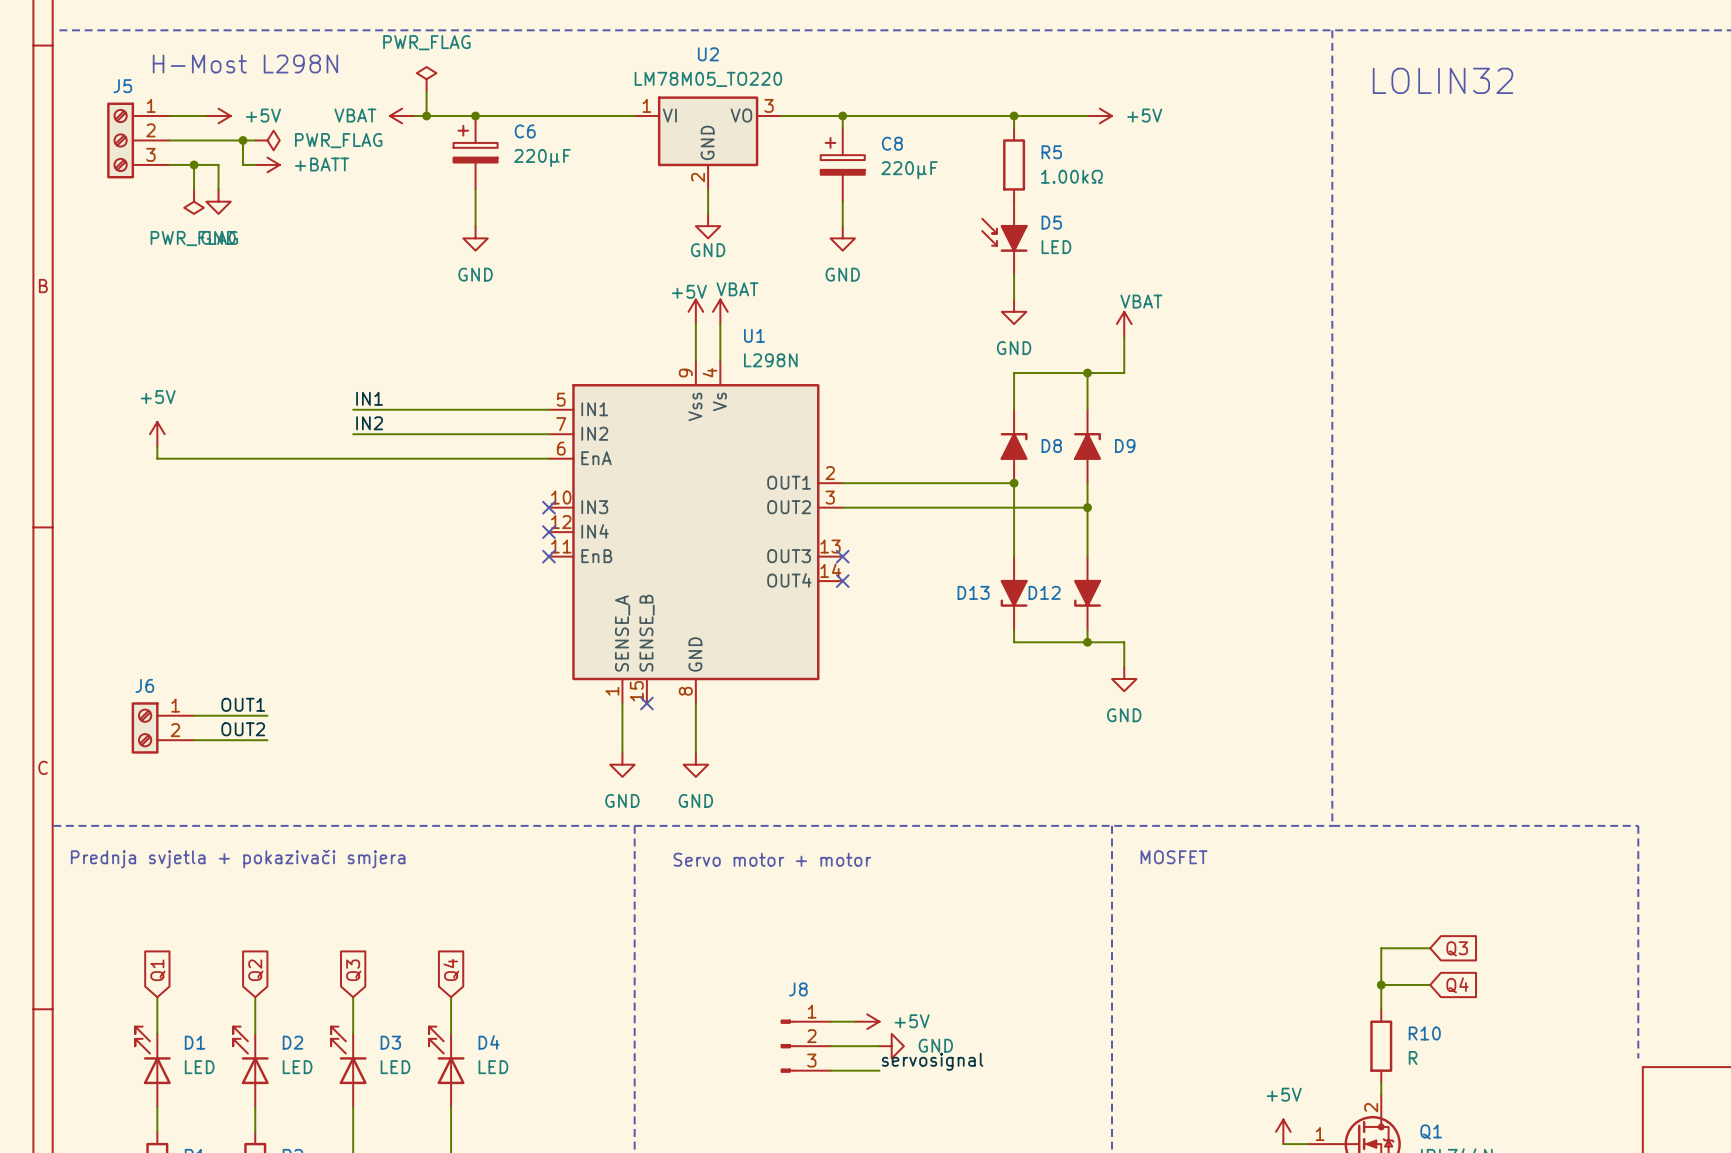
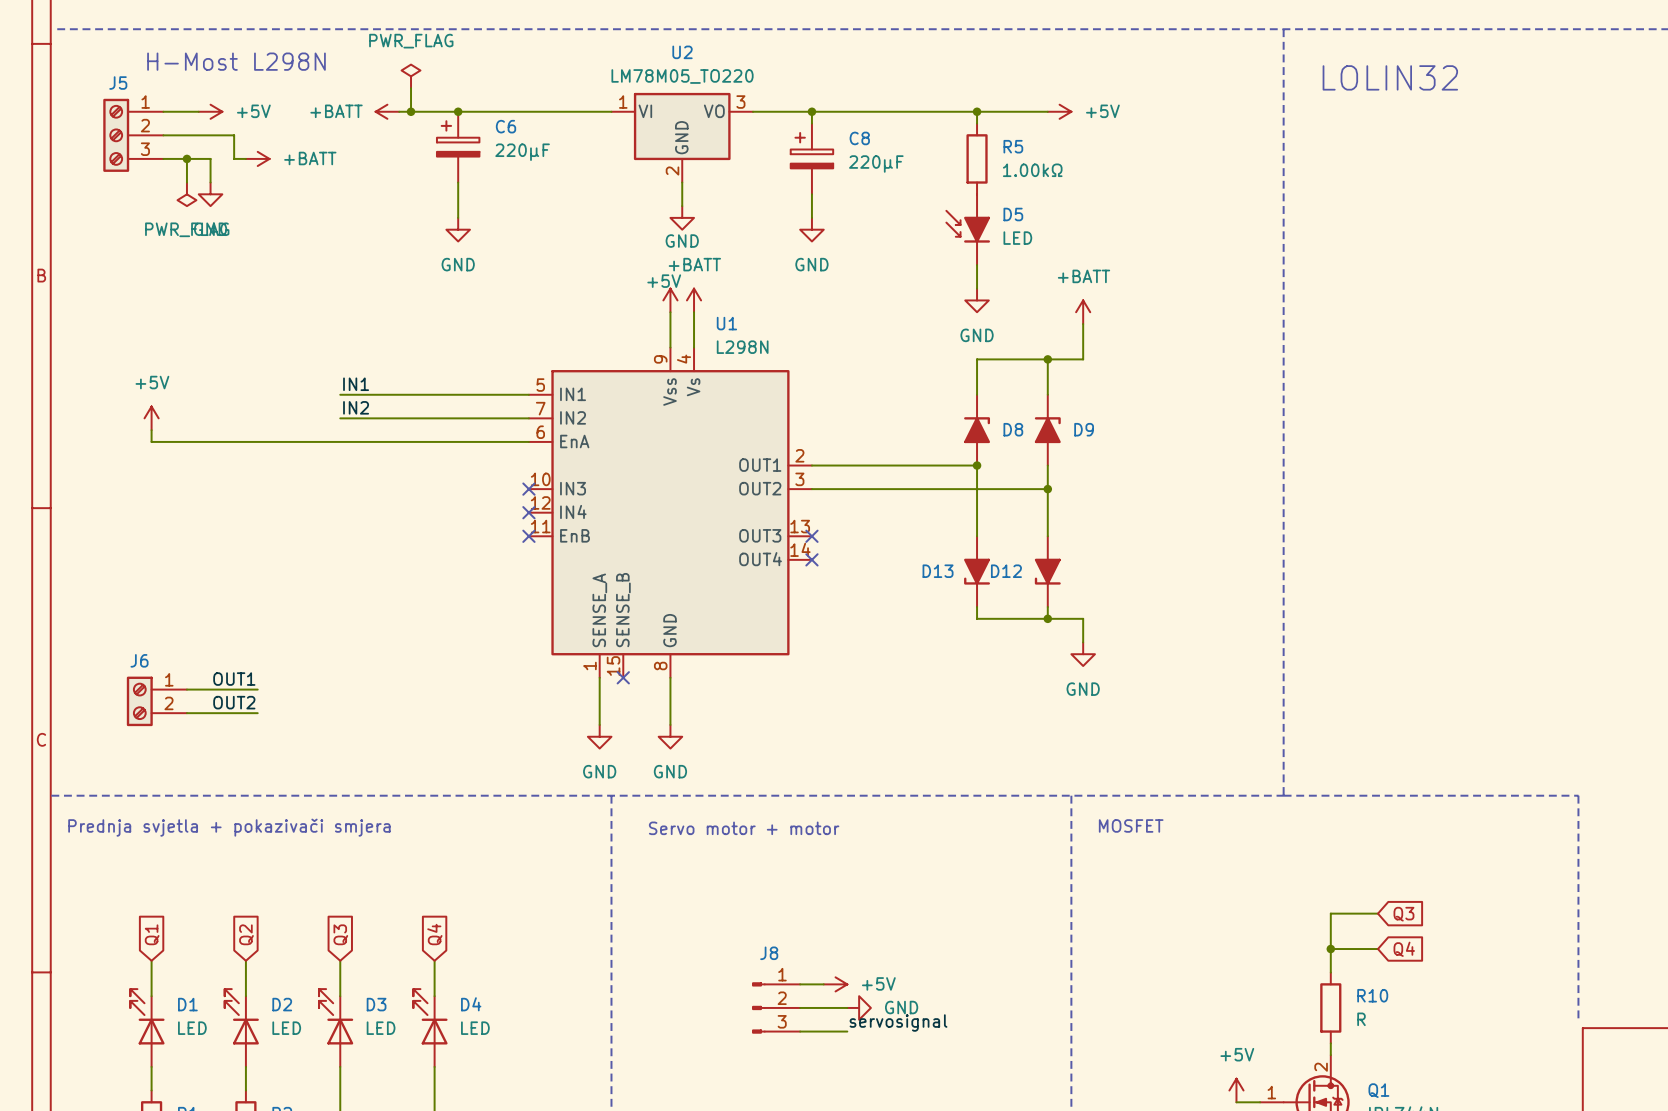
power symbol: VBAT (402, 116) -> +BATT (387, 111)
wire: (243, 140) (255, 140) -> none
junction: (243, 140) -> none
power symbol: PWR_FLAG (267, 140) -> none
power symbol: VBAT (720, 311) -> +BATT (694, 300)
power symbol: VBAT (1124, 324) -> +BATT (1083, 312)

